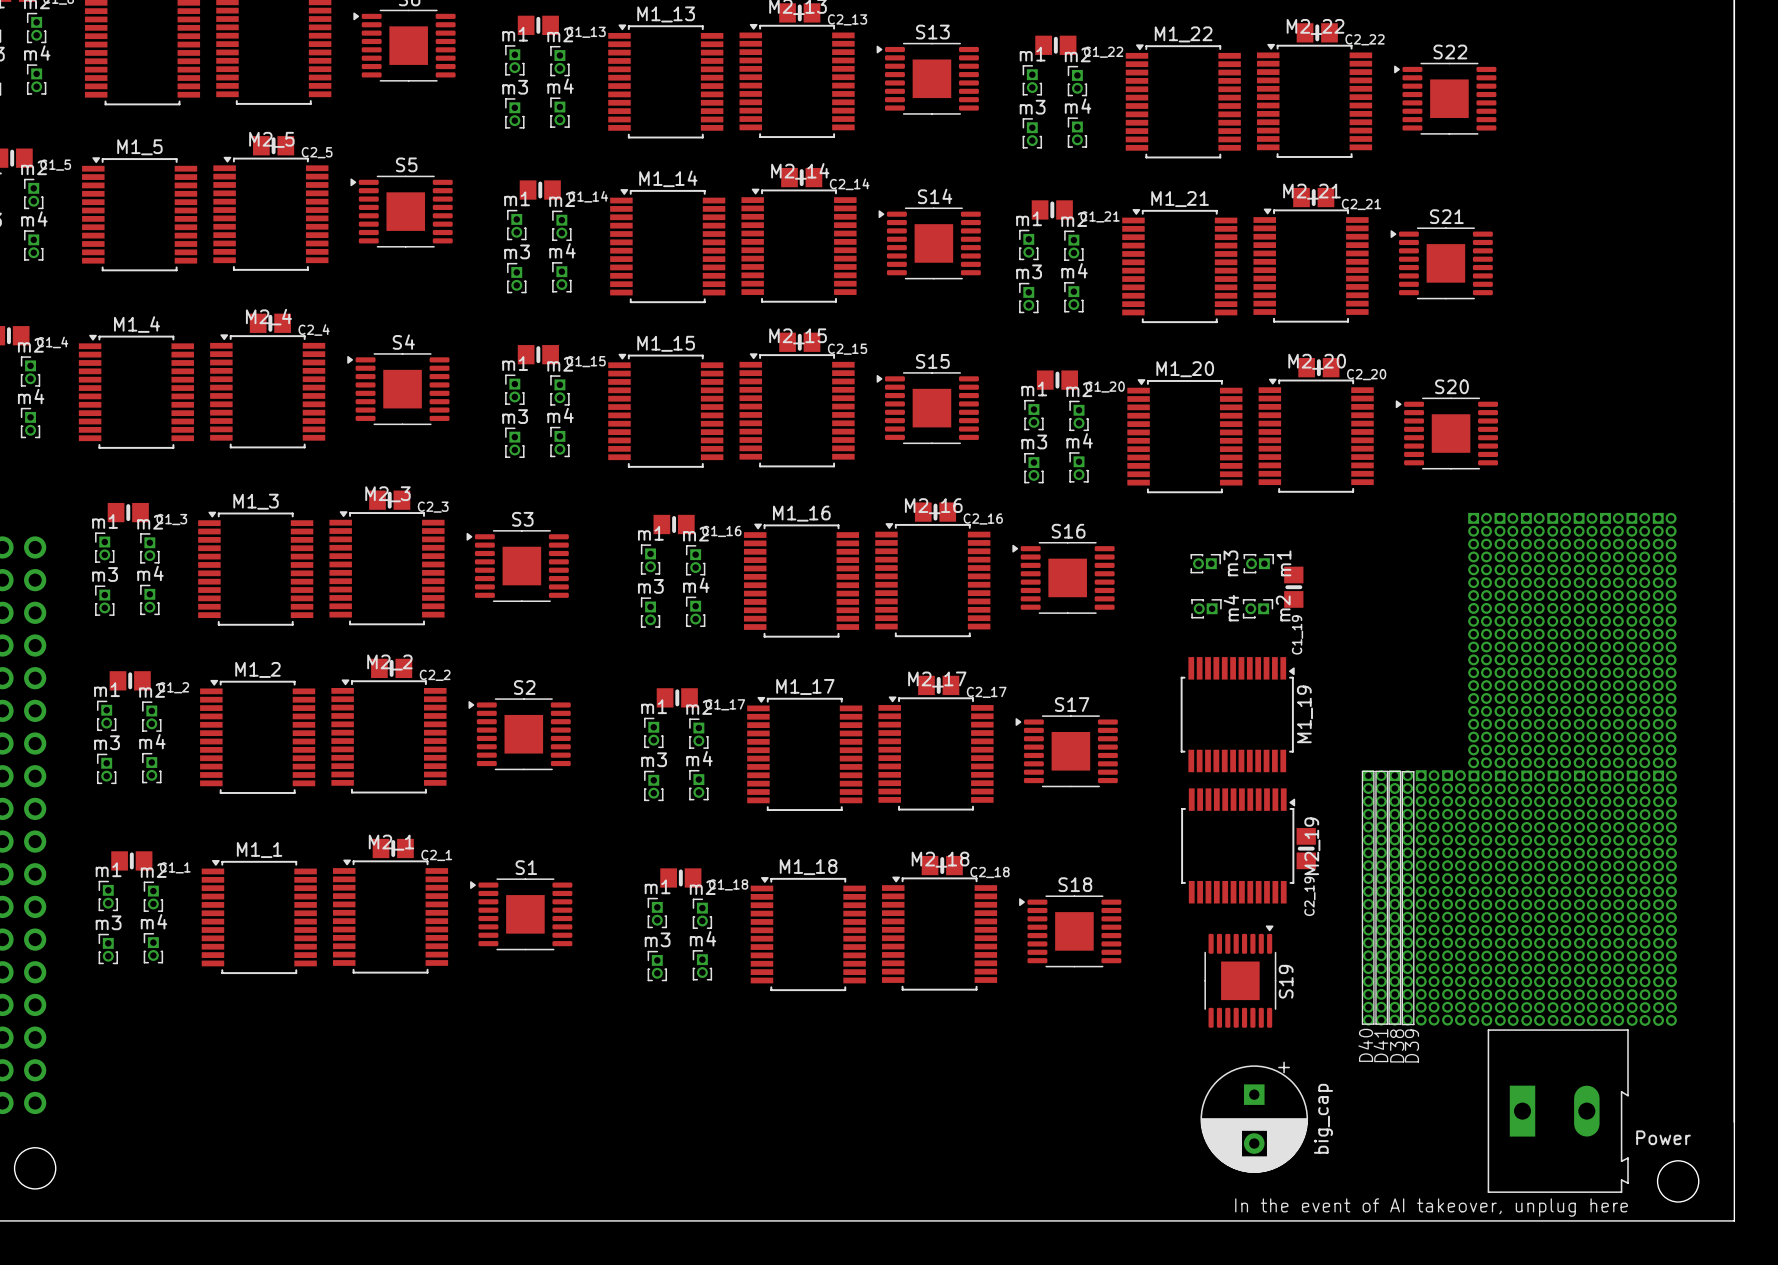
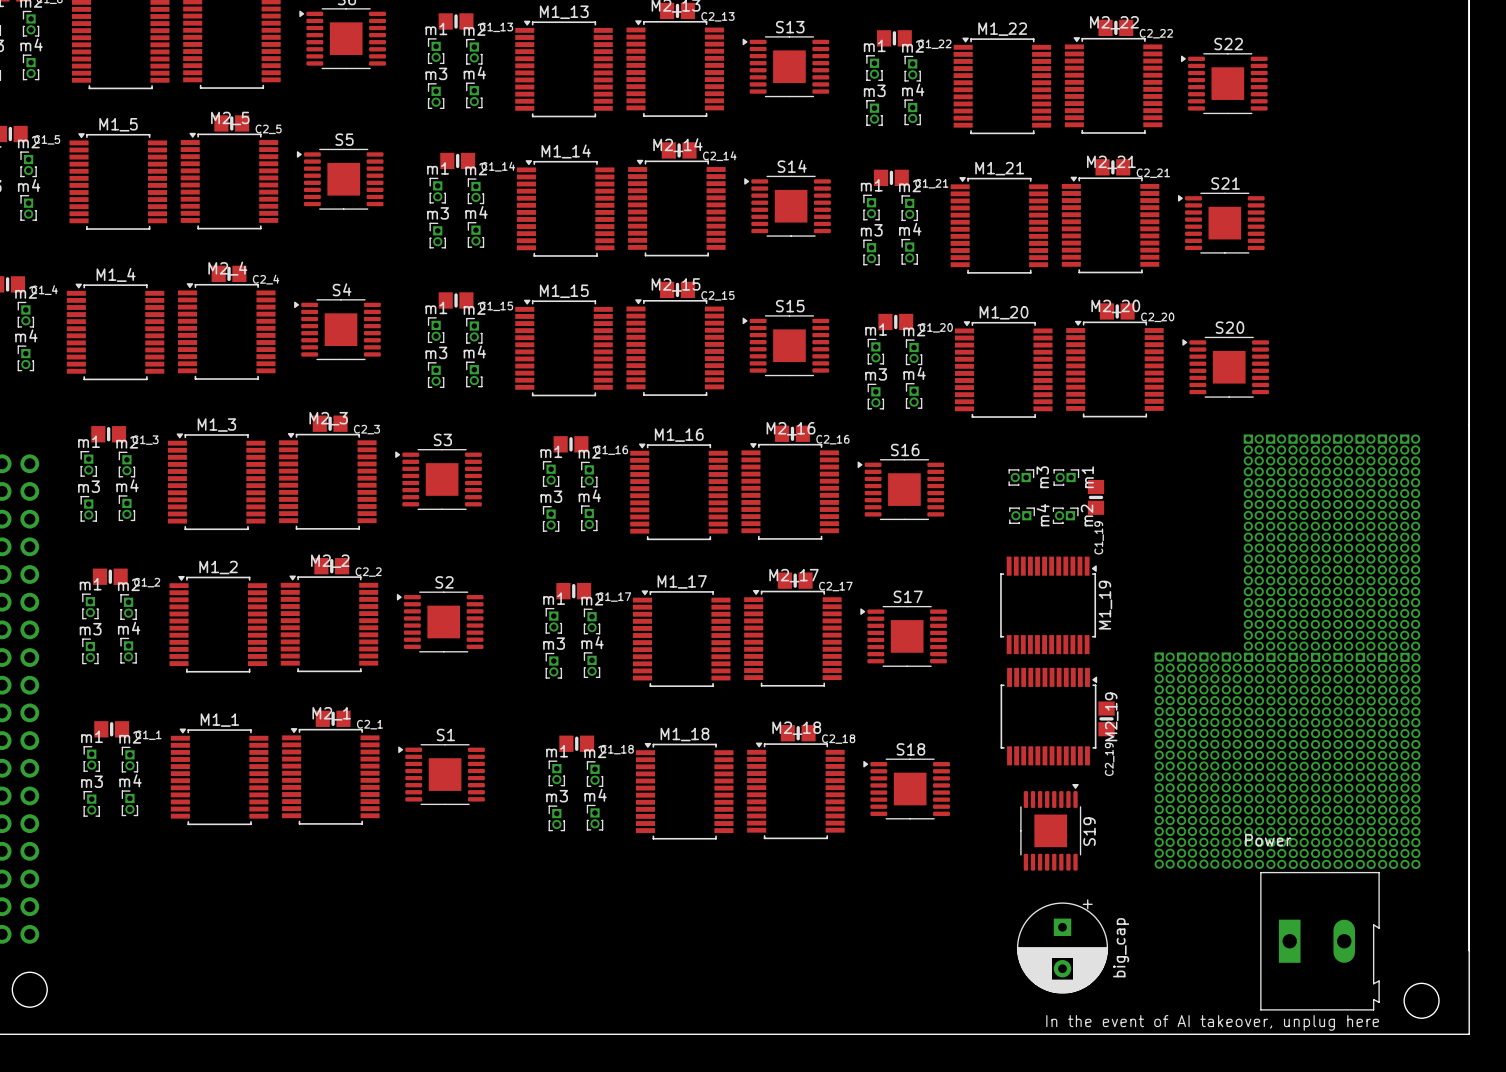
line: (1362, 771) (1373, 771) (1373, 1024) (1362, 1024) (1362, 771) -> none
line: (1375, 771) (1387, 771) (1387, 1024) (1375, 1024) (1375, 771) -> none
line: (1389, 771) (1400, 771) (1400, 1024) (1389, 1024) (1389, 771) -> none
line: (1402, 771) (1413, 771) (1413, 1024) (1402, 1024) (1402, 771) -> none
text: D40 (1365, 1045) -> none
text: D41 (1380, 1045) -> none
text: D38 (1397, 1045) -> none
text: D39 (1411, 1045) -> none
Power name position: Power (1663, 1137) -> Power (1268, 840)

